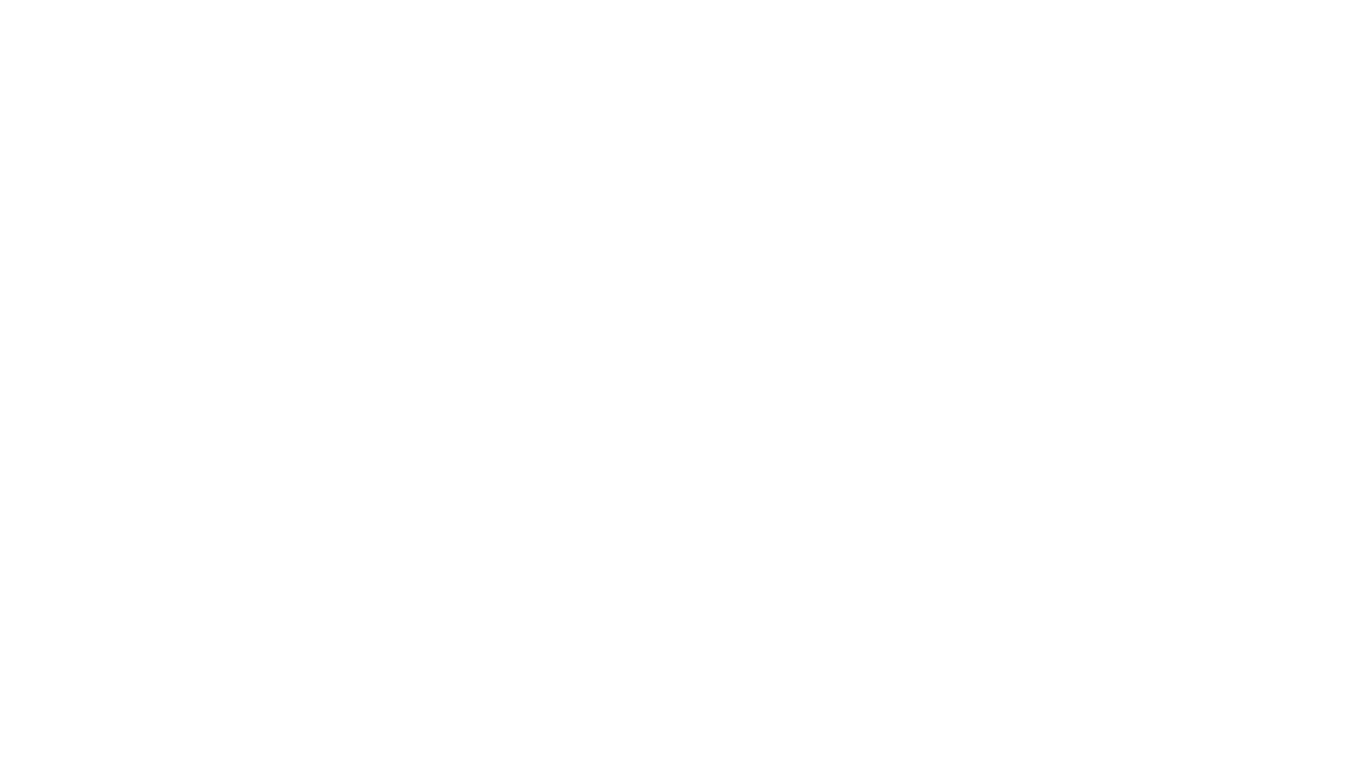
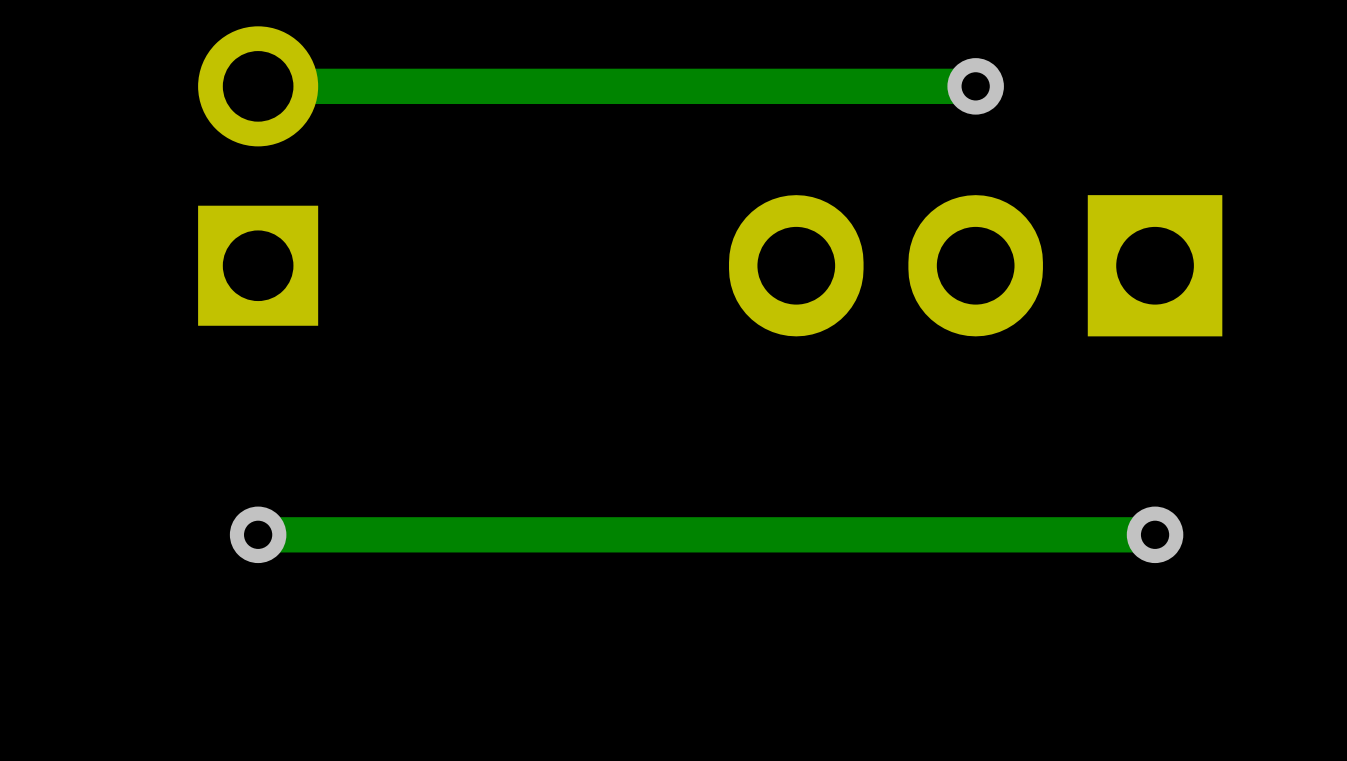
track: none -> (975, 86) (258, 86)
via: none -> (975, 86)
part: none -> (258, 176)
part: none -> (975, 265)
via: none -> (258, 534)
track: none -> (1155, 534) (258, 534)
via: none -> (1155, 534)

